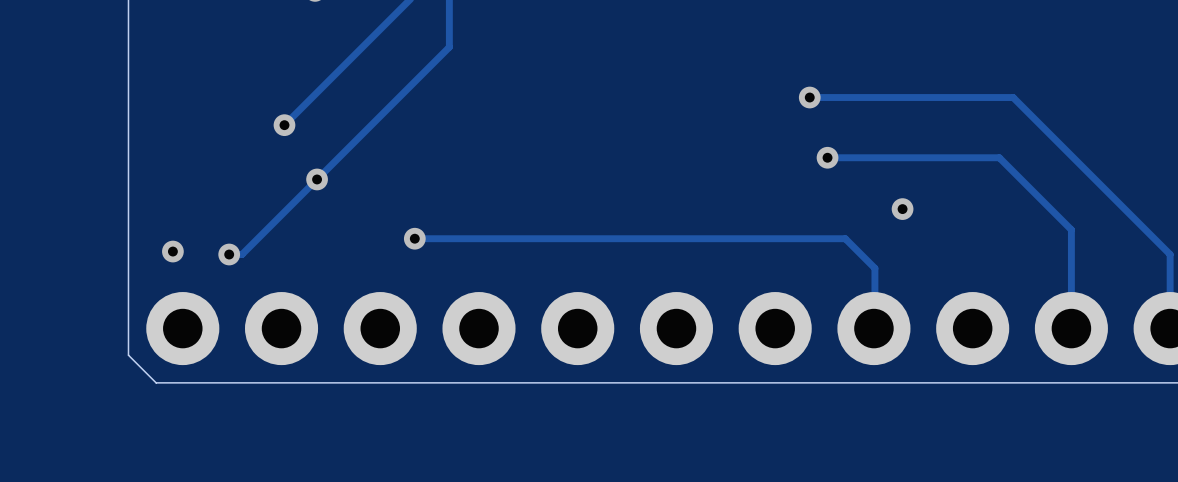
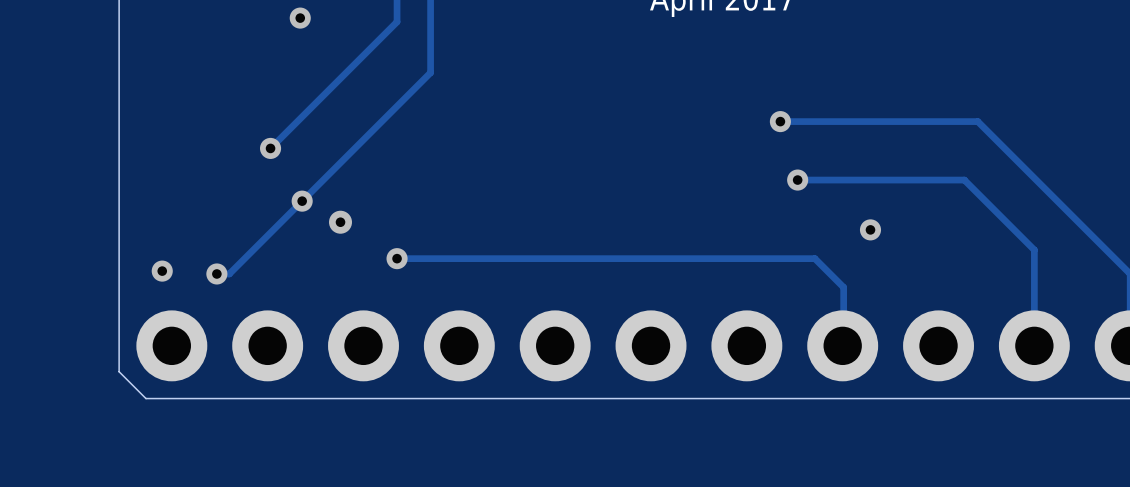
via: none -> (340, 222)

